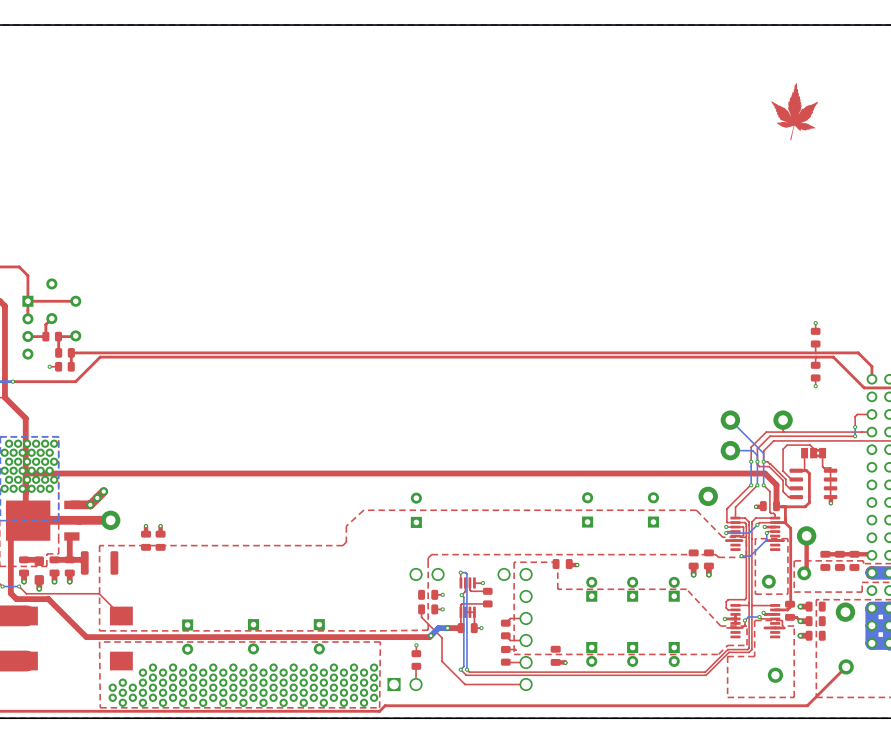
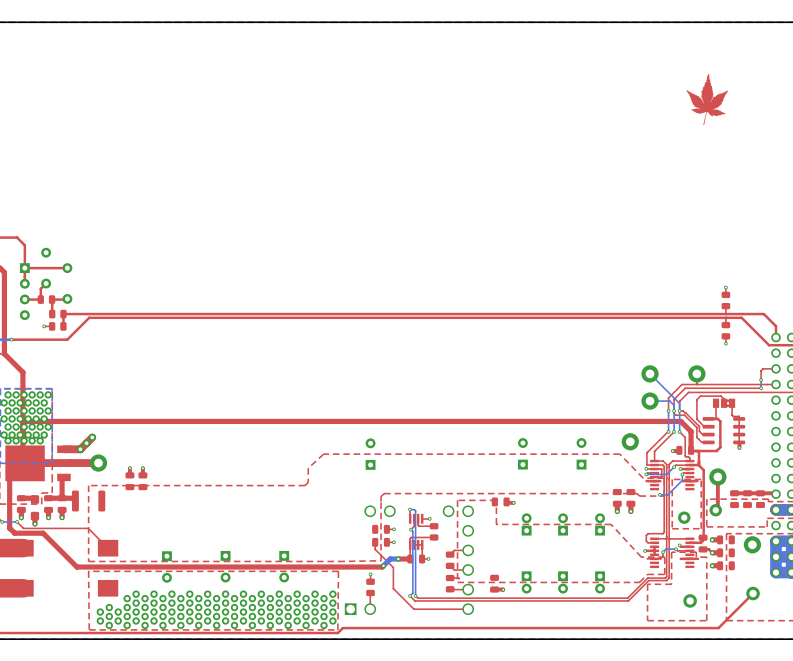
via: none -> (8, 440)
via: none -> (16, 440)
via: none -> (24, 440)
via: none -> (32, 440)
via: none -> (40, 440)

